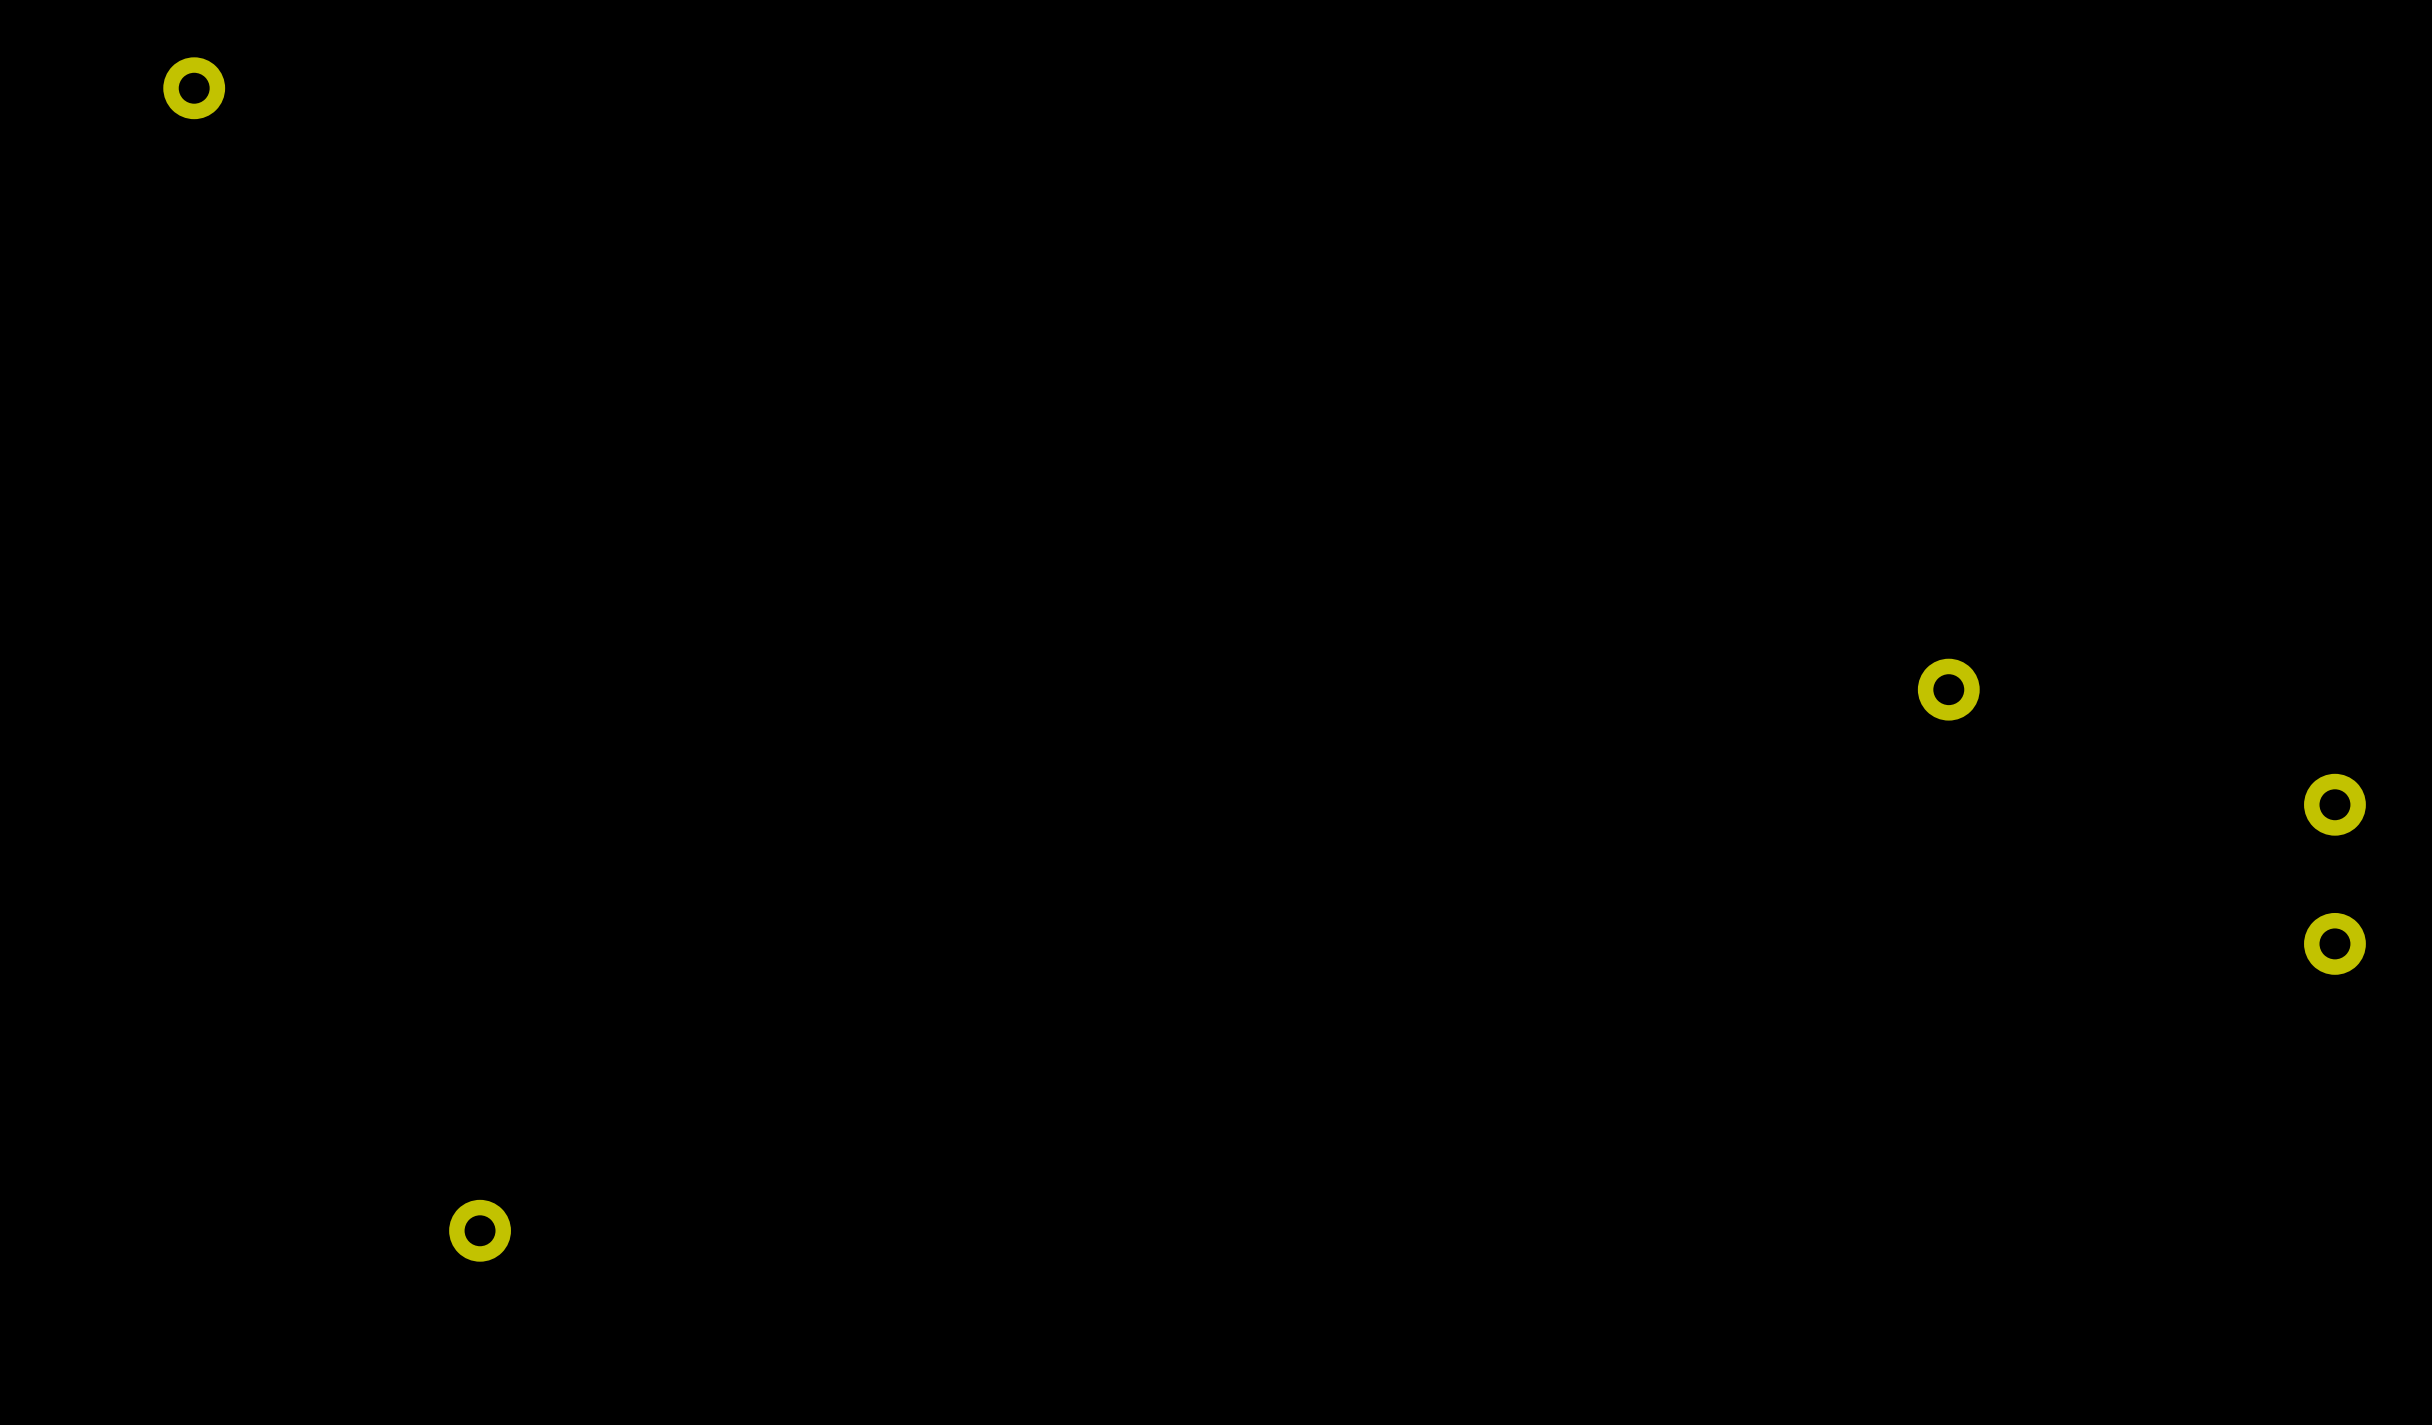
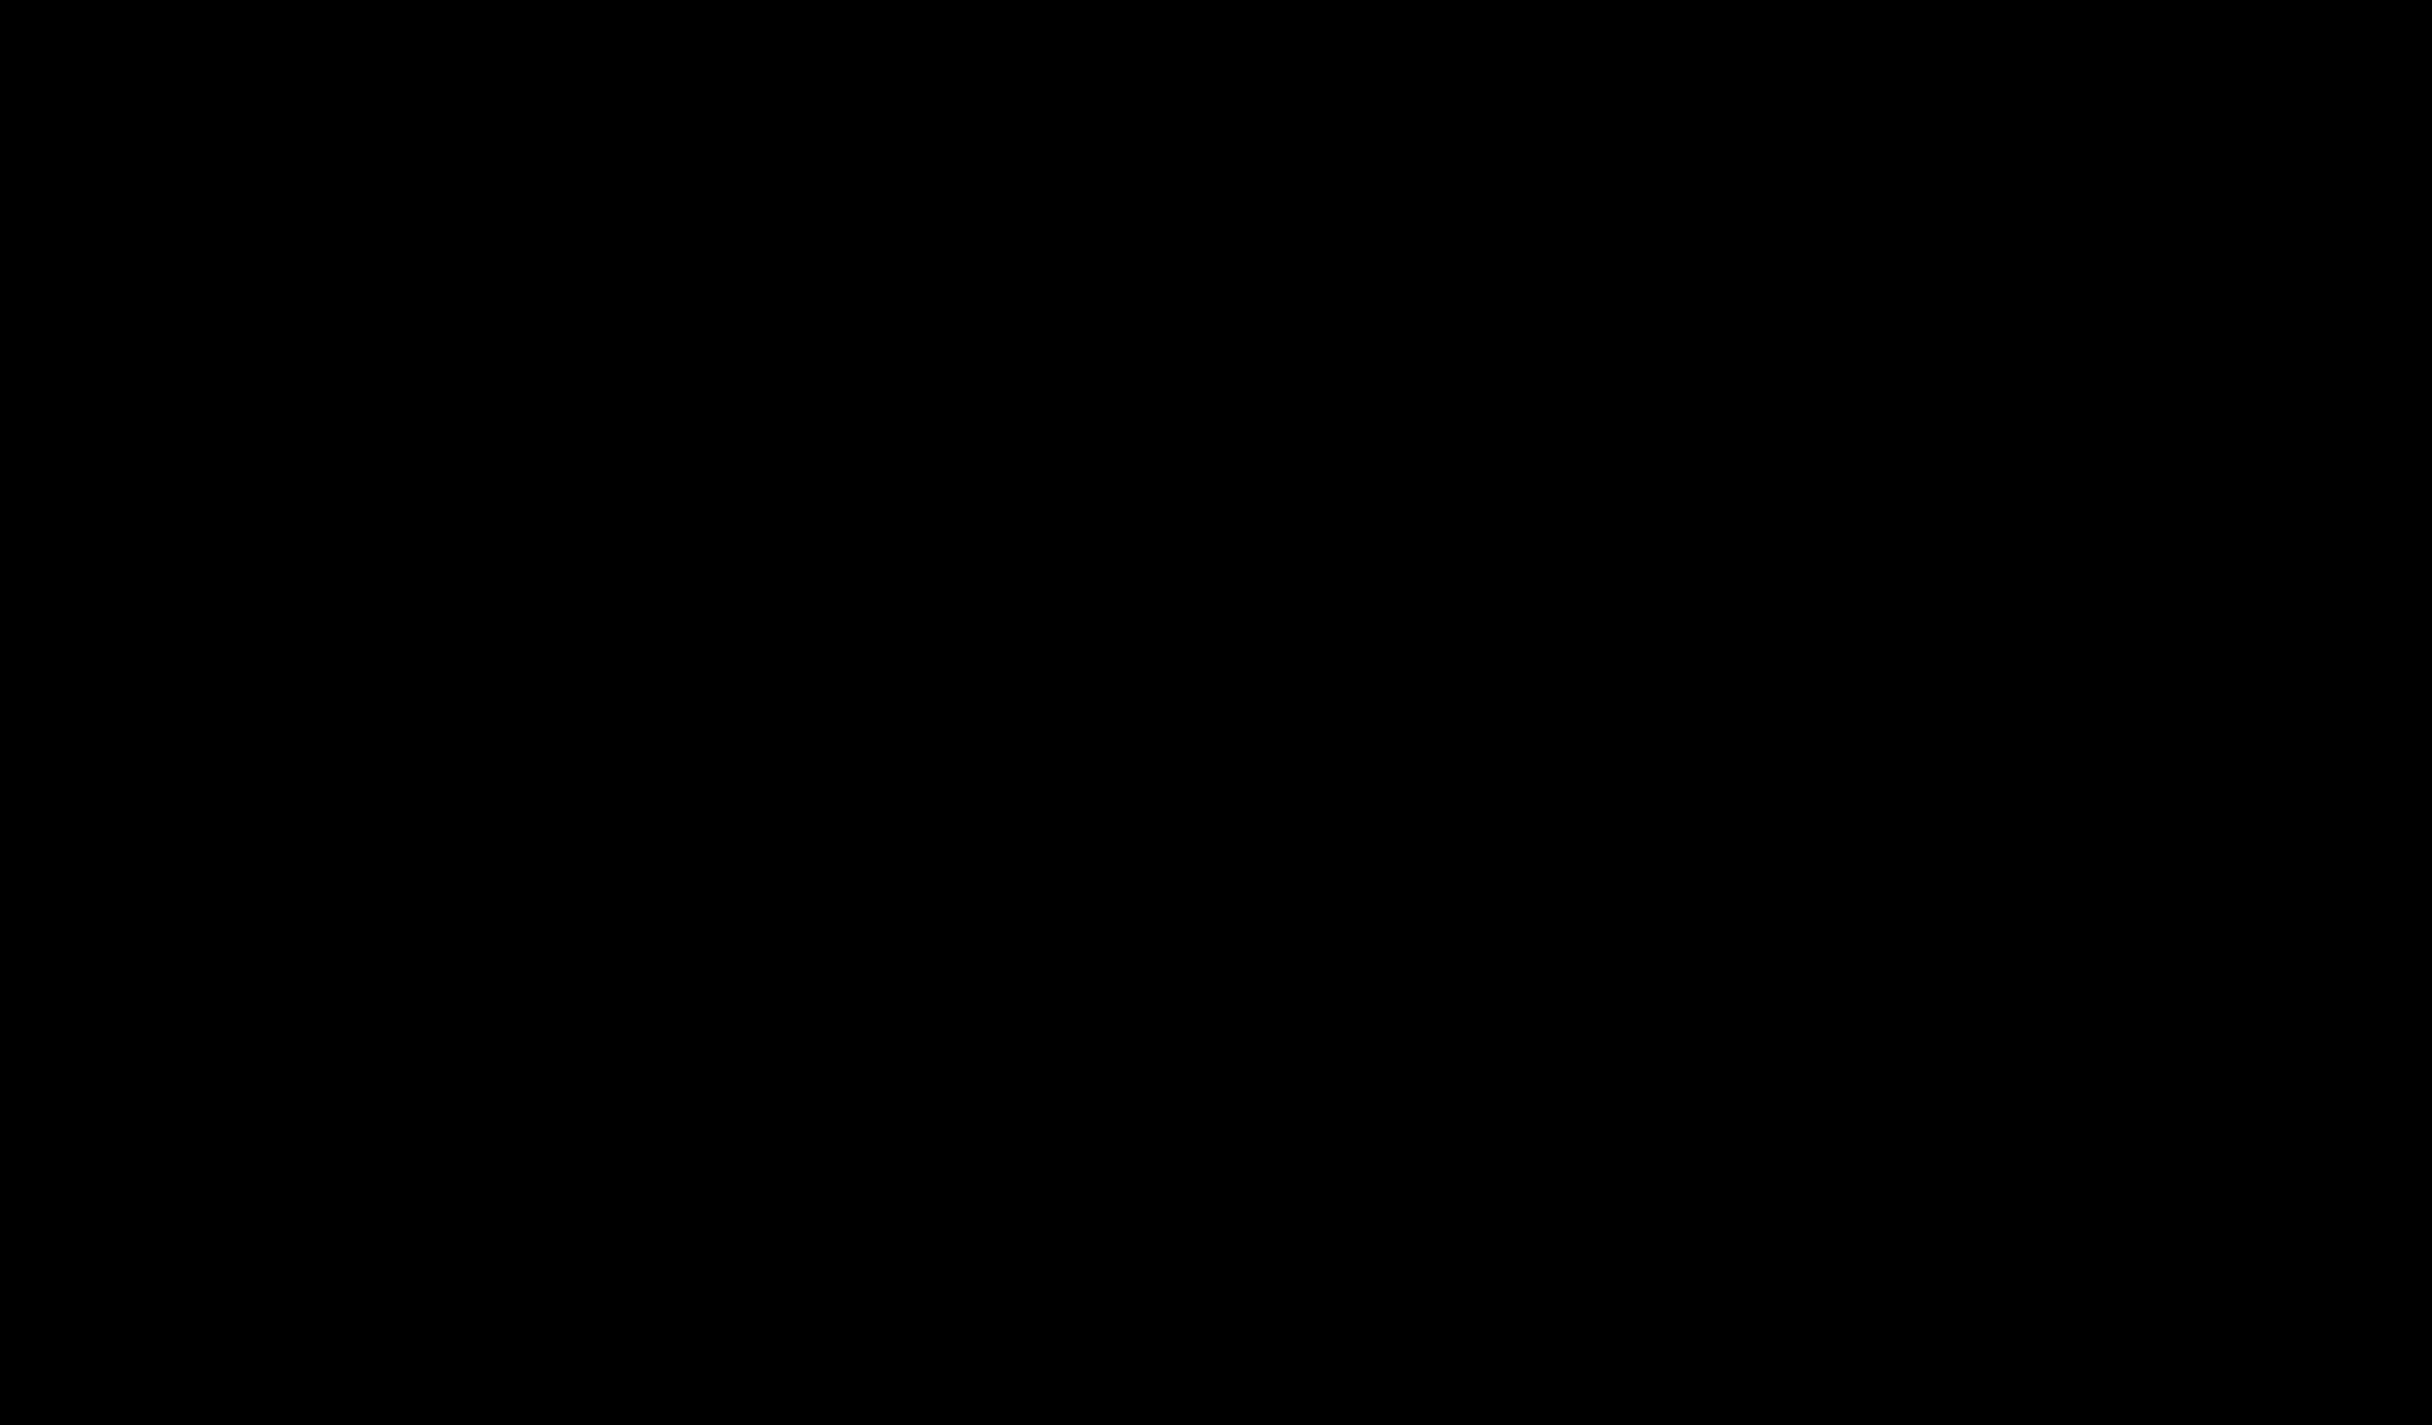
part: (194, 88) -> none
part: (1948, 689) -> none
part: (2334, 804) -> none
part: (2334, 943) -> none
part: (480, 1230) -> none

